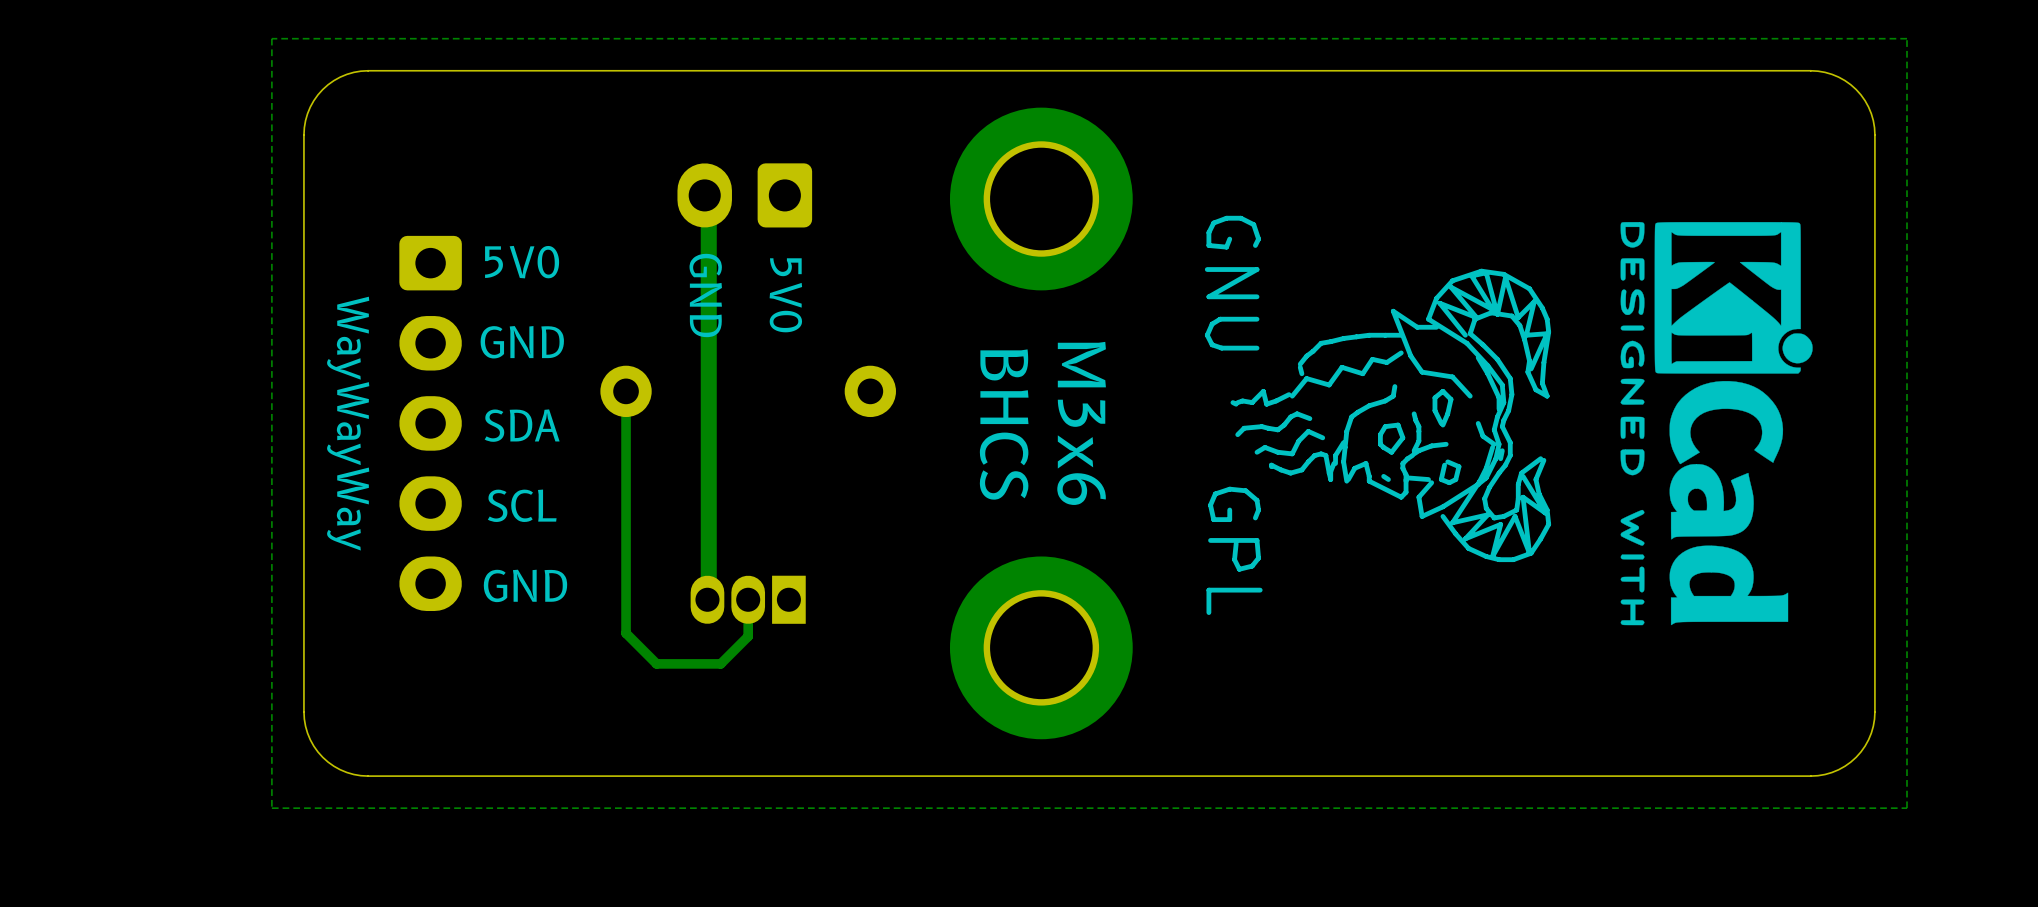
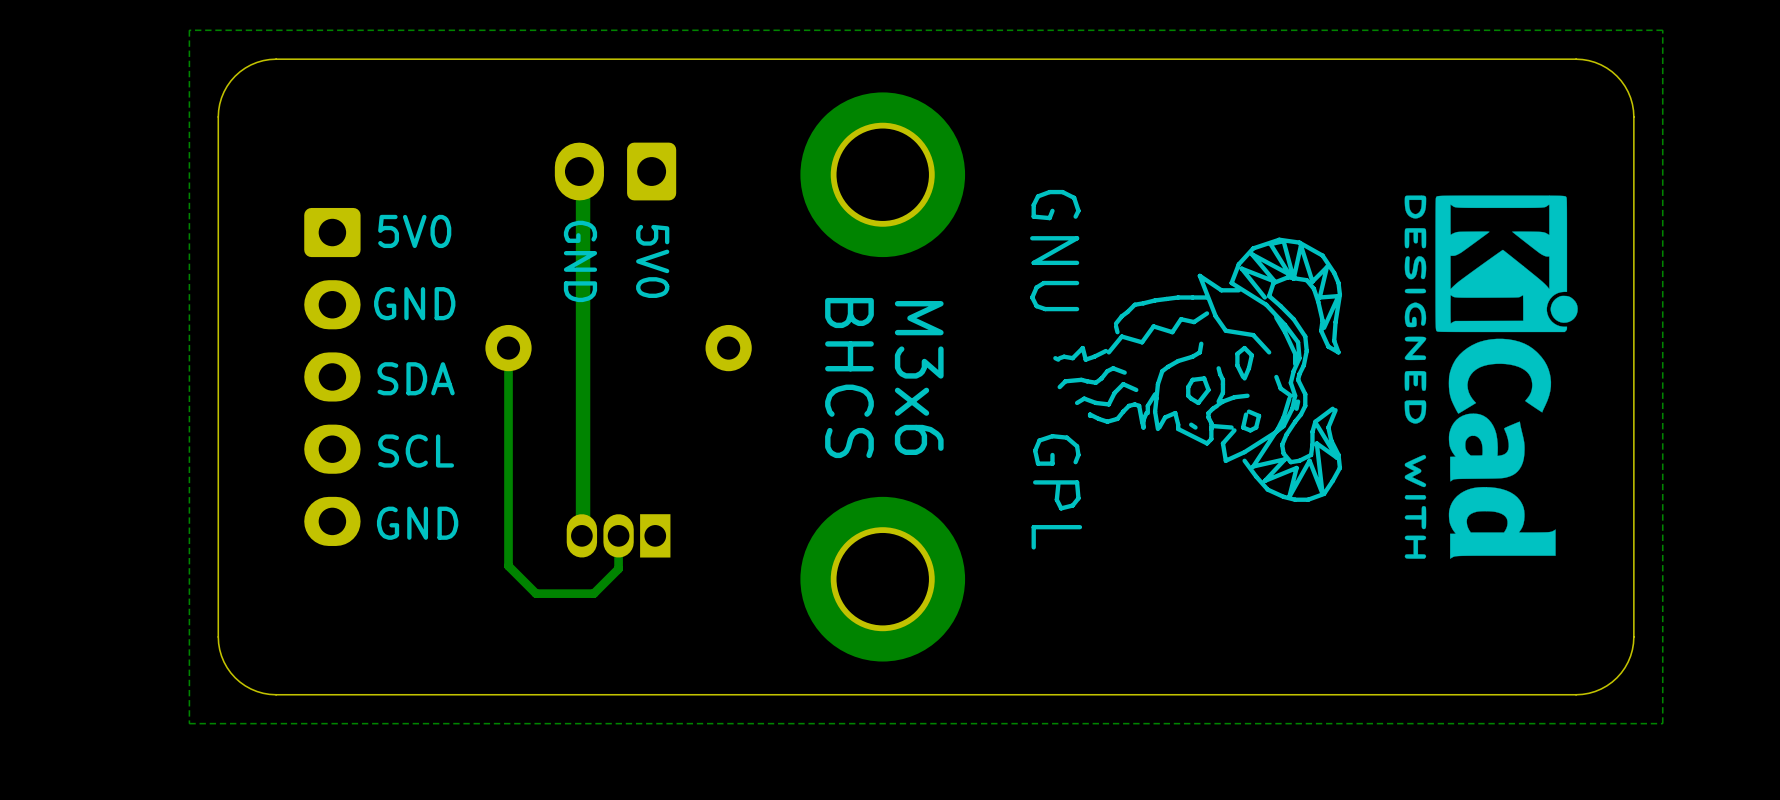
text: WayWayWay (348, 423) -> none

